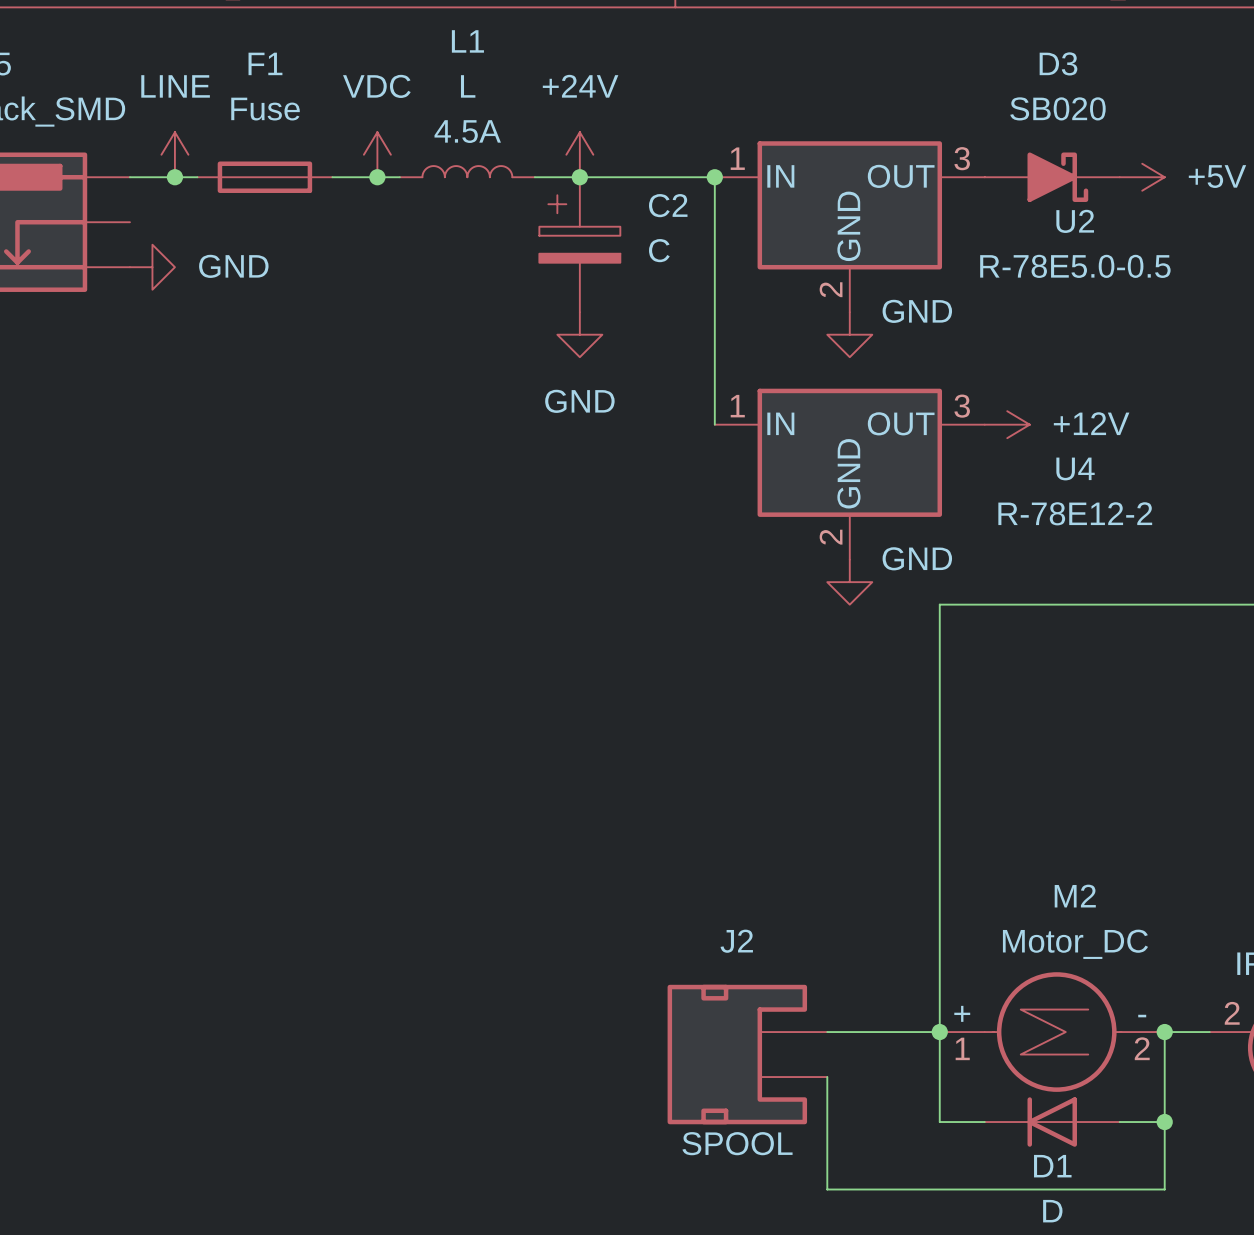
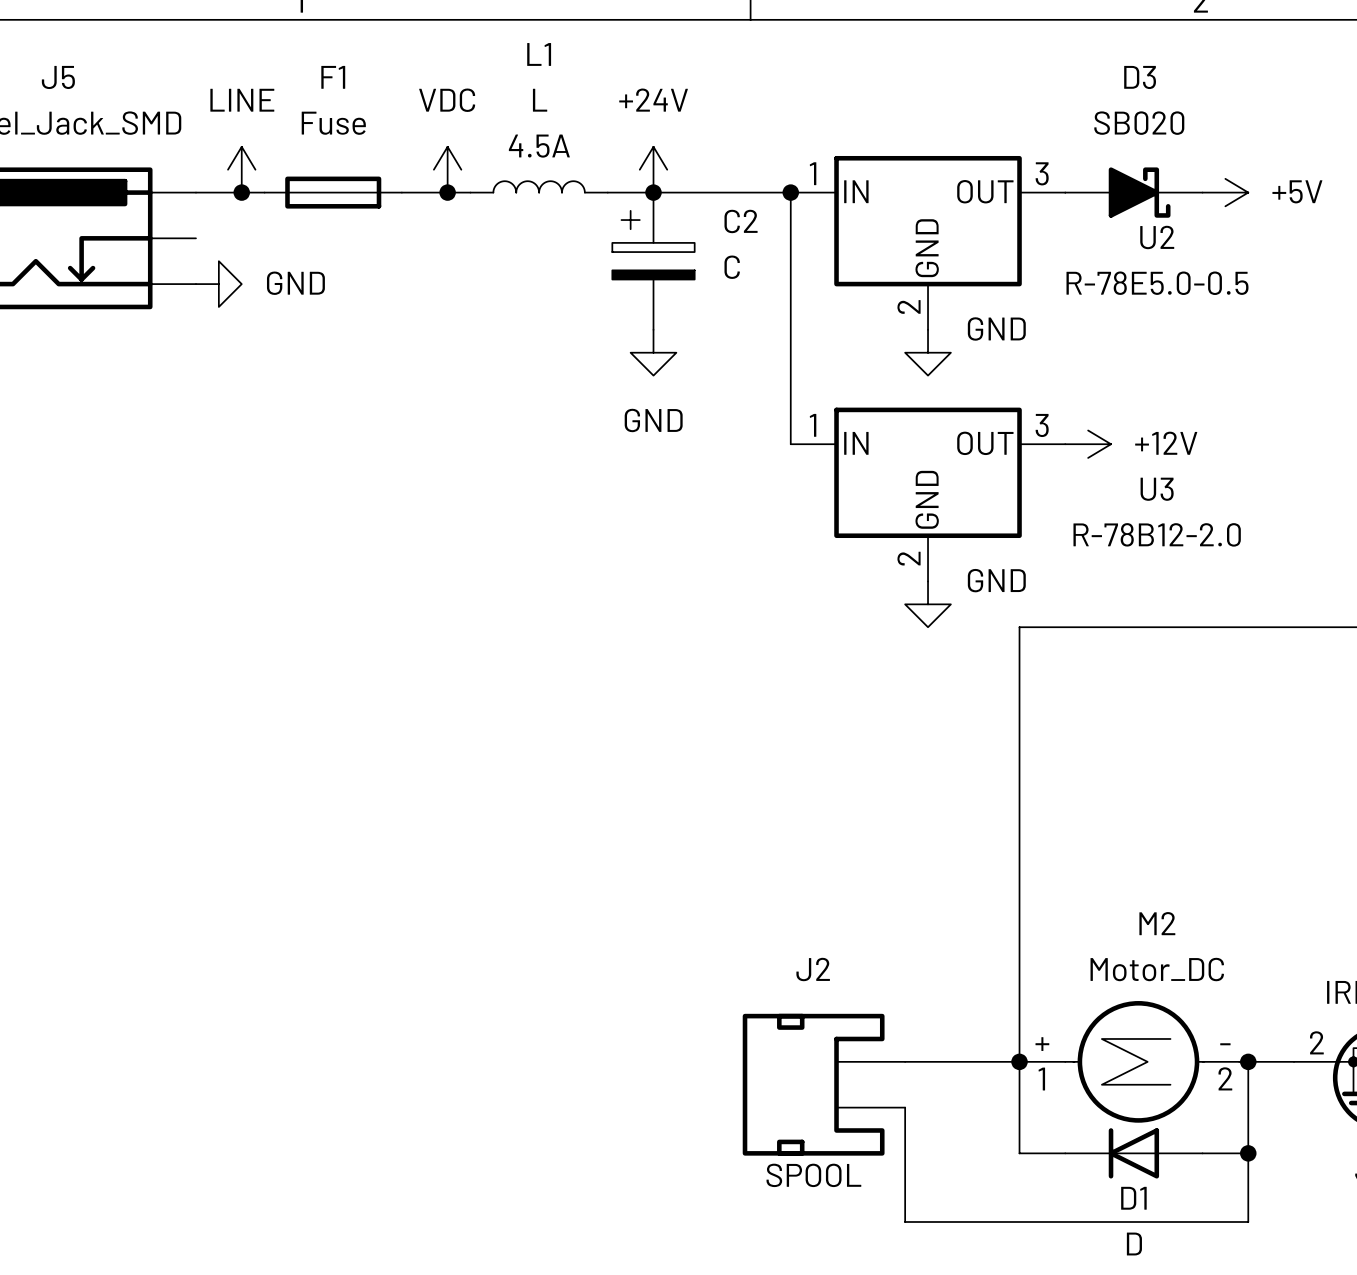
U4 name: U4 (1075, 468) -> U3 (1157, 489)
U4 value: R-78E12-2 (1075, 513) -> R-78B12-2.0 (1157, 534)

